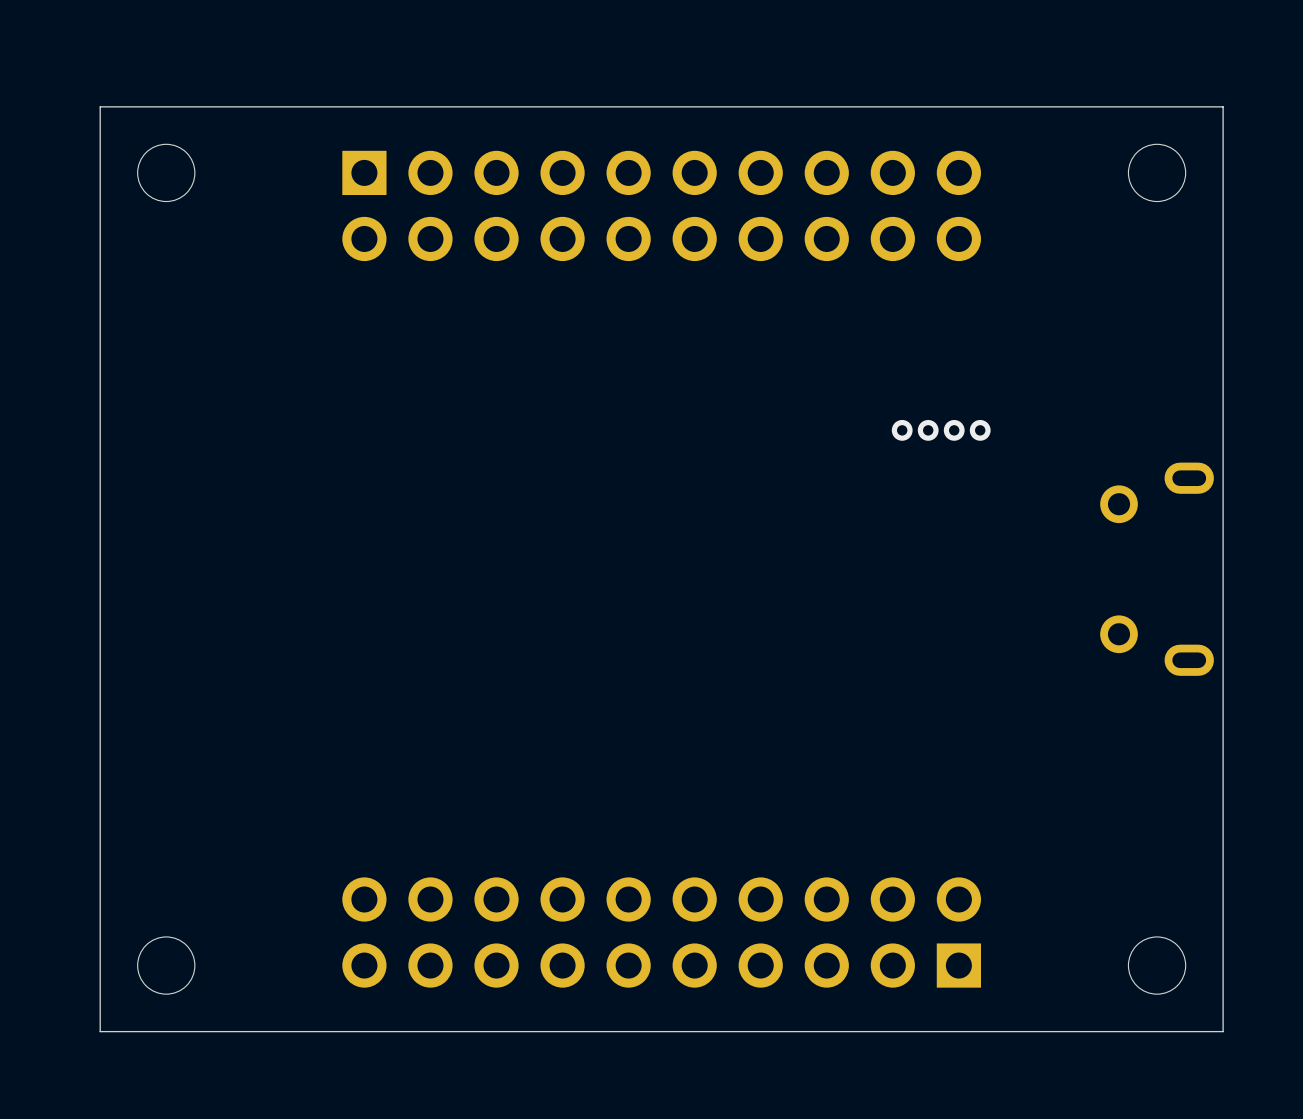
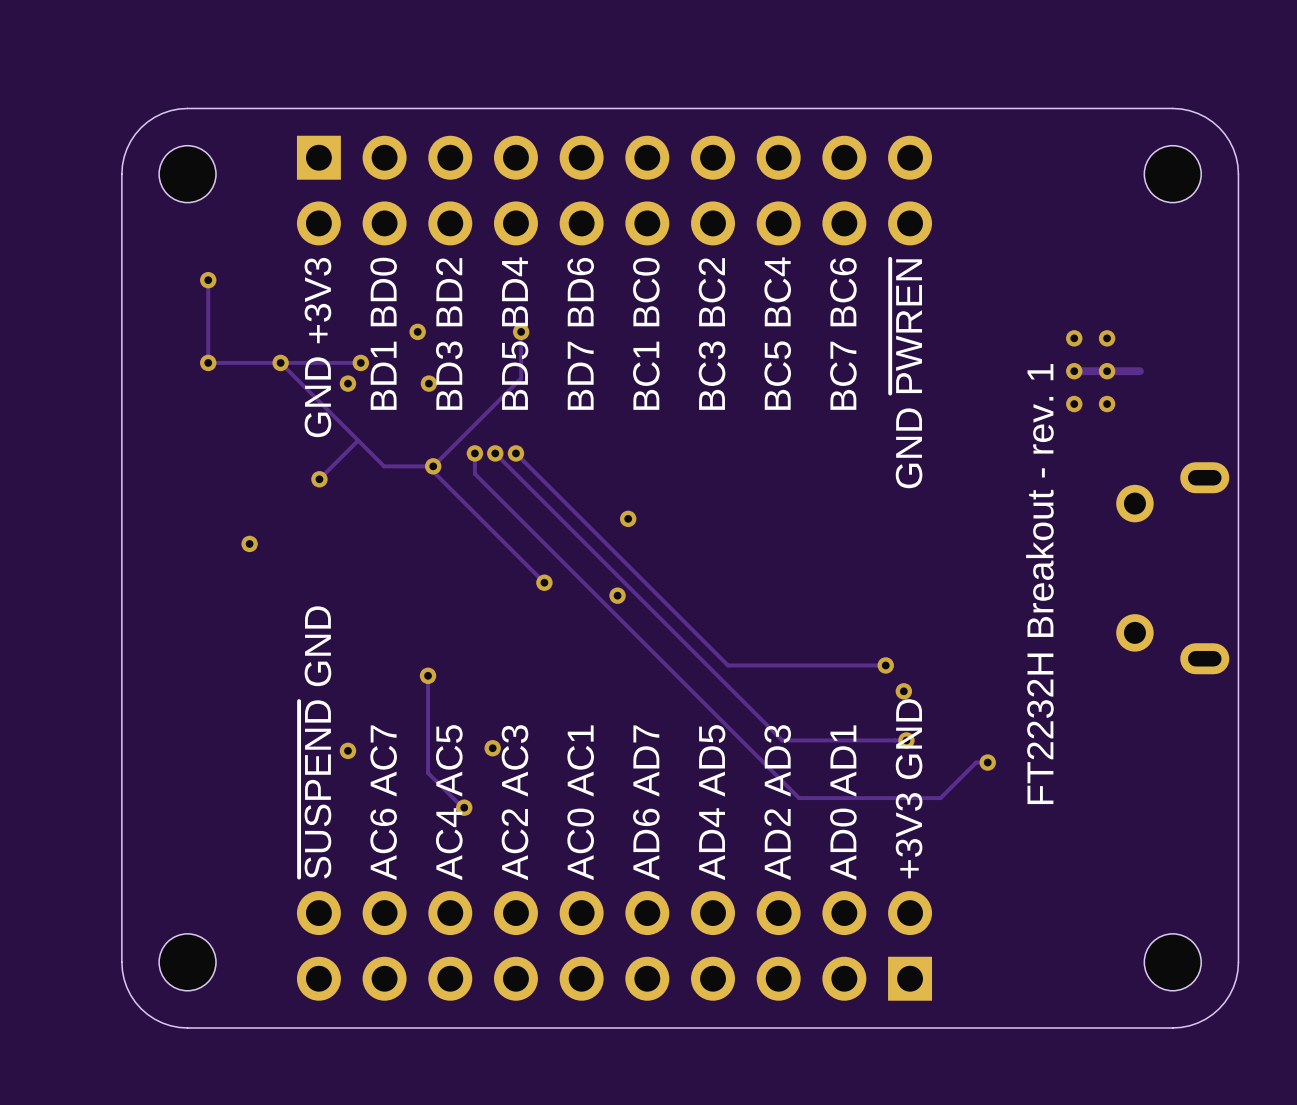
board edge: (166, 106) (100, 106) (100, 172) -> (187, 108) (162, 113) (141, 127) (126, 149) (121, 174)
board edge: (1157, 106) (1223, 106) (1223, 172) -> (1172, 108) (1197, 113) (1219, 127) (1233, 149) (1238, 174)
part position: (661, 205) -> (614, 190)
track: none -> (208, 280) (208, 362) (360, 362)
via: none -> (208, 280)
via: none -> (417, 331)
track: none -> (521, 331) (521, 378) (433, 466)
via: none -> (521, 331)
via: none -> (1074, 338)
via: none -> (1107, 338)
text: none -> BD5 BD4 (515, 333)
text: none -> BC5 BC4 (777, 333)
text: none -> BD1 BD0 (383, 333)
text: none -> BD3 BD2 (449, 333)
text: none -> BD7 BD6 (580, 333)
text: none -> BC1 BC0 (646, 333)
text: none -> BC3 BC2 (712, 333)
text: none -> BC7 BC6 (843, 333)
text: none -> GND +3V3 (317, 347)
via: none -> (208, 362)
track: none -> (280, 362) (384, 466) (433, 466)
via: none -> (280, 362)
via: none -> (360, 362)
via: none -> (1074, 371)
via: none -> (1107, 371)
track: none -> (1139, 371) (1074, 371)
text: none -> GND ~{PWREN} (906, 373)
via: none -> (347, 383)
via: none -> (428, 383)
via: none -> (1074, 404)
via: none -> (1107, 404)
via: (902, 430) -> none
via: (928, 430) -> none
via: (954, 430) -> none
via: (980, 430) -> none
track: none -> (358, 440) (319, 479)
track: none -> (474, 453) (474, 473) (799, 798) (940, 798) (976, 762) (987, 762)
via: none -> (474, 453)
track: none -> (495, 453) (782, 740) (906, 740)
via: none -> (495, 453)
track: none -> (515, 453) (728, 665) (885, 665)
via: none -> (515, 453)
track: none -> (433, 466) (433, 471) (544, 582)
via: none -> (433, 466)
via: none -> (319, 479)
via: none -> (628, 518)
via: none -> (249, 543)
via: none -> (544, 582)
text: none -> FT2232H Breakout - rev. 1 (1039, 584)
via: none -> (617, 595)
via: none -> (885, 665)
track: none -> (428, 675) (428, 773) (464, 807)
via: none -> (428, 675)
via: none -> (903, 691)
text: none -> ~{SUSPEND} GND (315, 742)
via: none -> (906, 740)
via: none -> (492, 748)
via: none -> (347, 750)
via: none -> (987, 762)
text: none -> +3V3 GND (909, 788)
text: none -> AC6 AC7 (383, 802)
text: none -> AC4 AC5 (449, 802)
text: none -> AC2 AC3 (514, 802)
text: none -> AC0 AC1 (580, 802)
text: none -> AD6 AD7 (646, 802)
text: none -> AD4 AD5 (712, 802)
text: none -> AD2 AD3 (777, 802)
text: none -> AD0 AD1 (843, 802)
via: none -> (464, 807)
part position: (661, 932) -> (614, 945)
board edge: (100, 965) (100, 1031) (166, 1031) -> (121, 962) (126, 987) (141, 1008) (162, 1023) (187, 1028)
board edge: (1223, 965) (1223, 1031) (1157, 1031) -> (1238, 962) (1233, 987) (1219, 1008) (1197, 1023) (1172, 1028)

